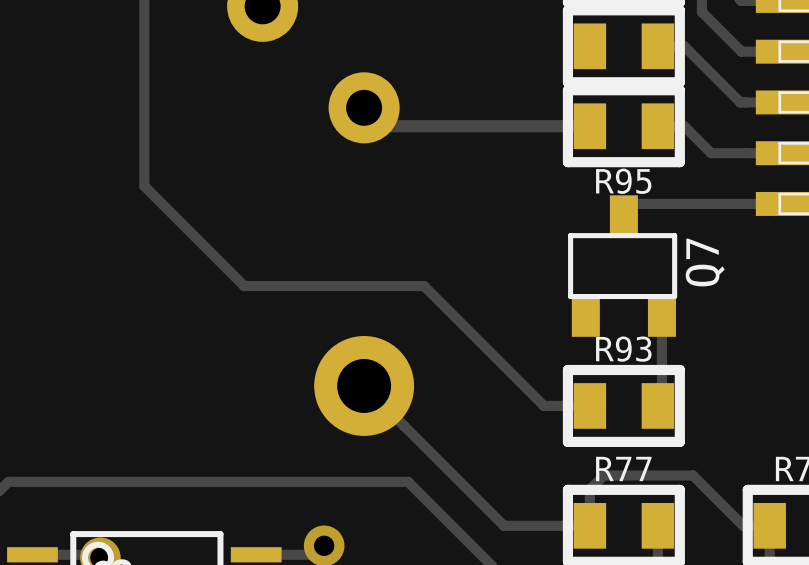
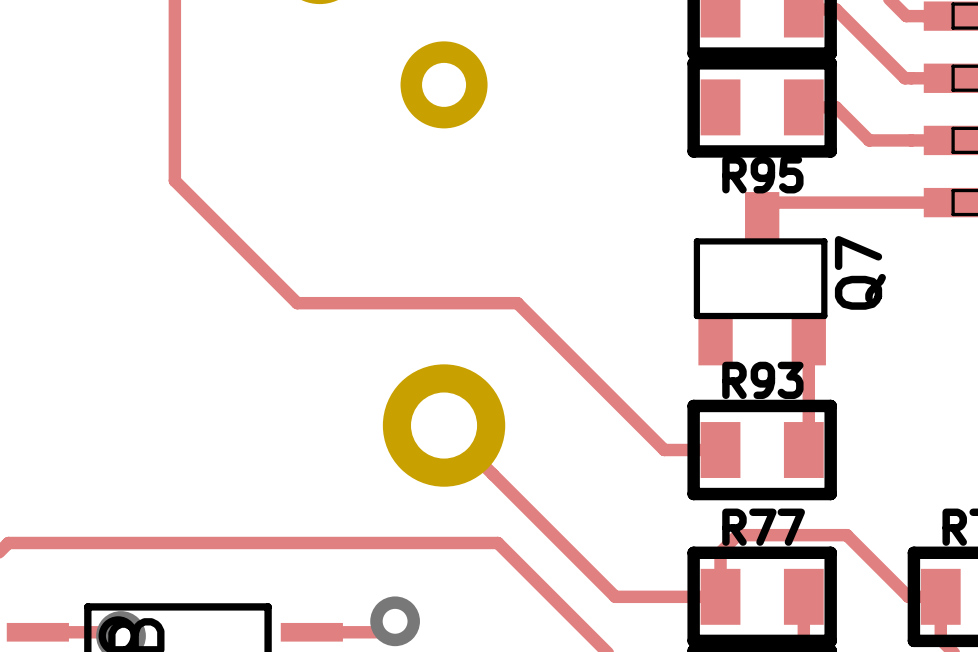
track: (364, 107) (382, 126) (589, 126) -> none

